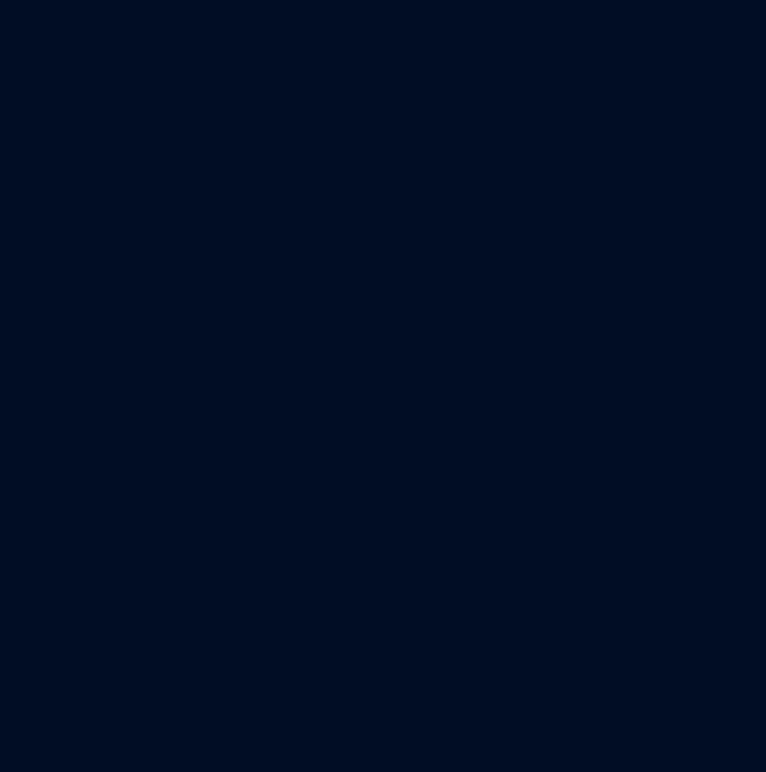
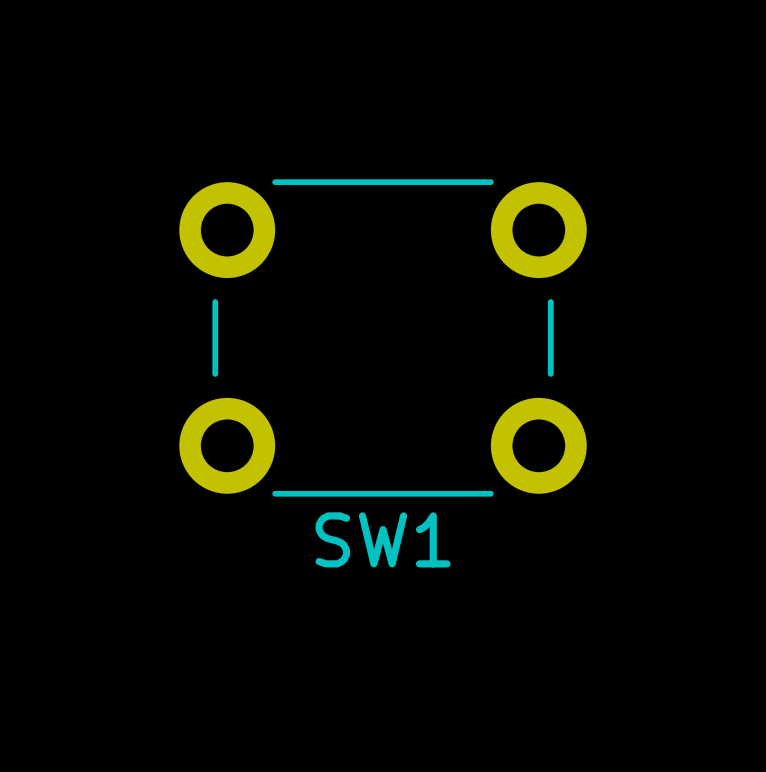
SW1: none -> (383, 337)

